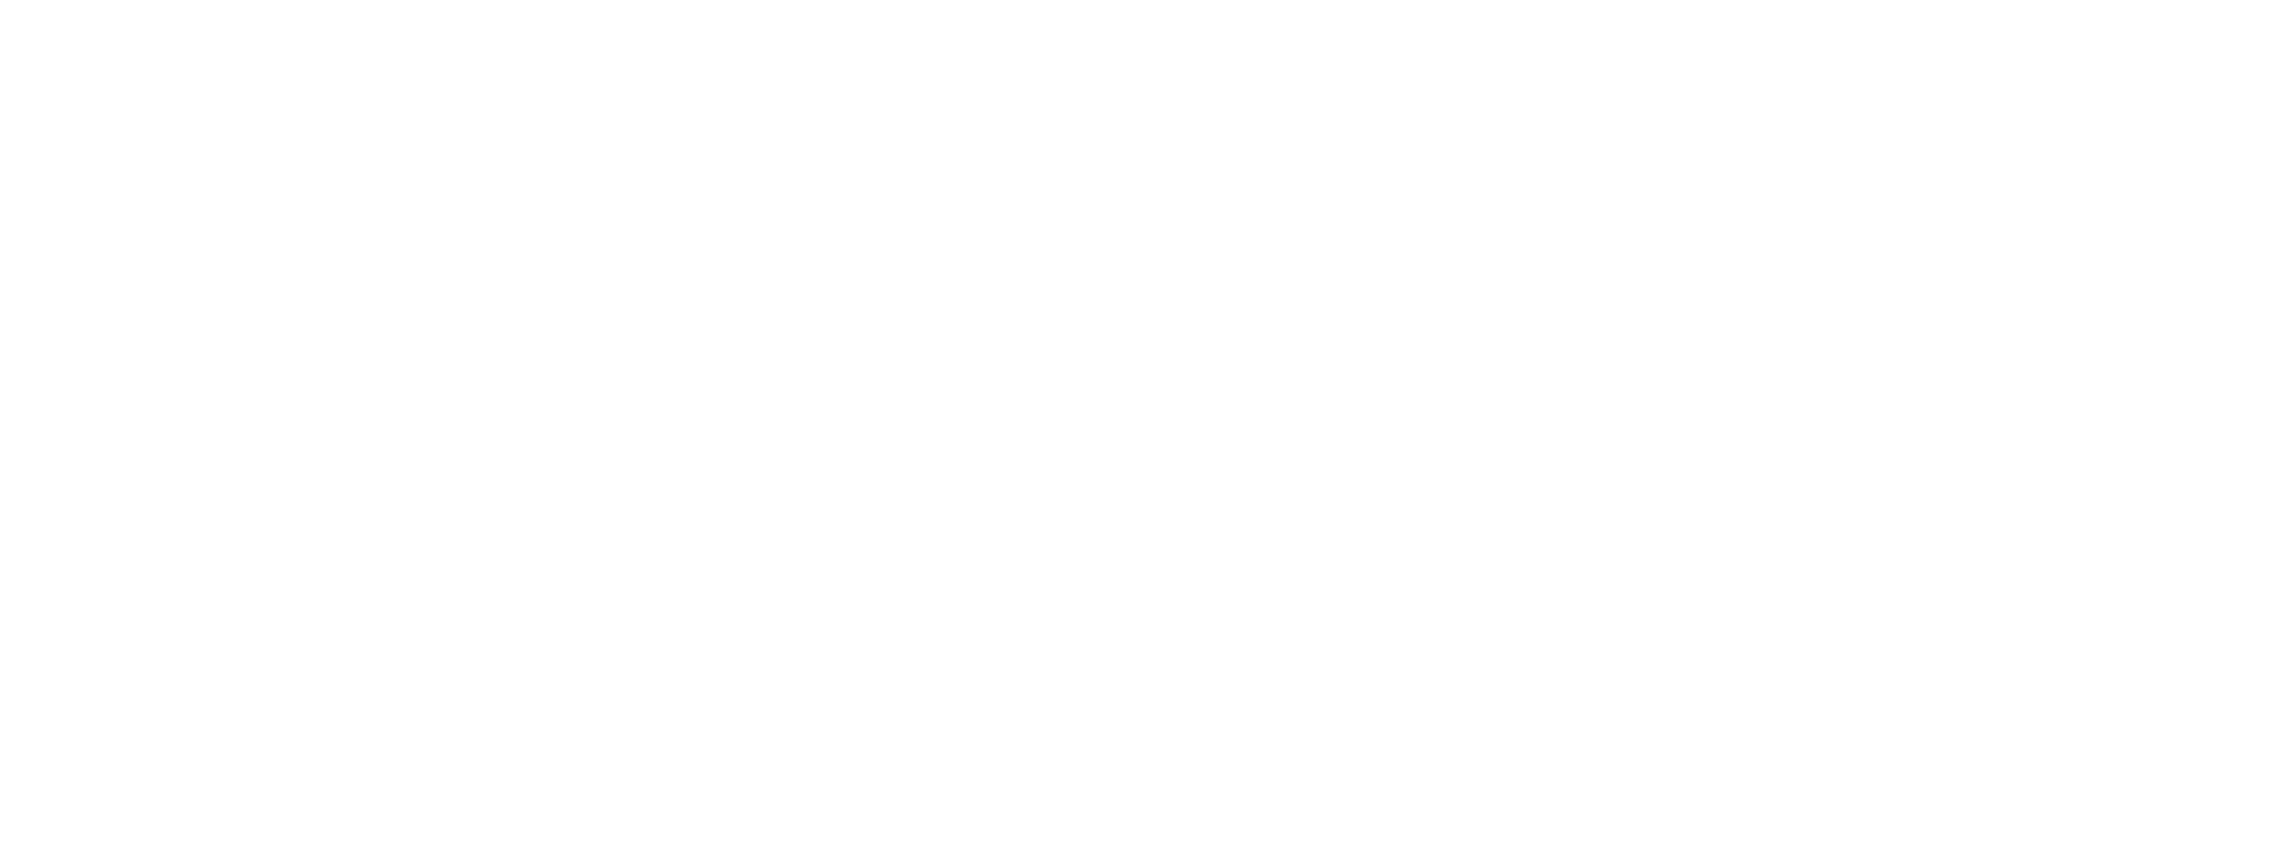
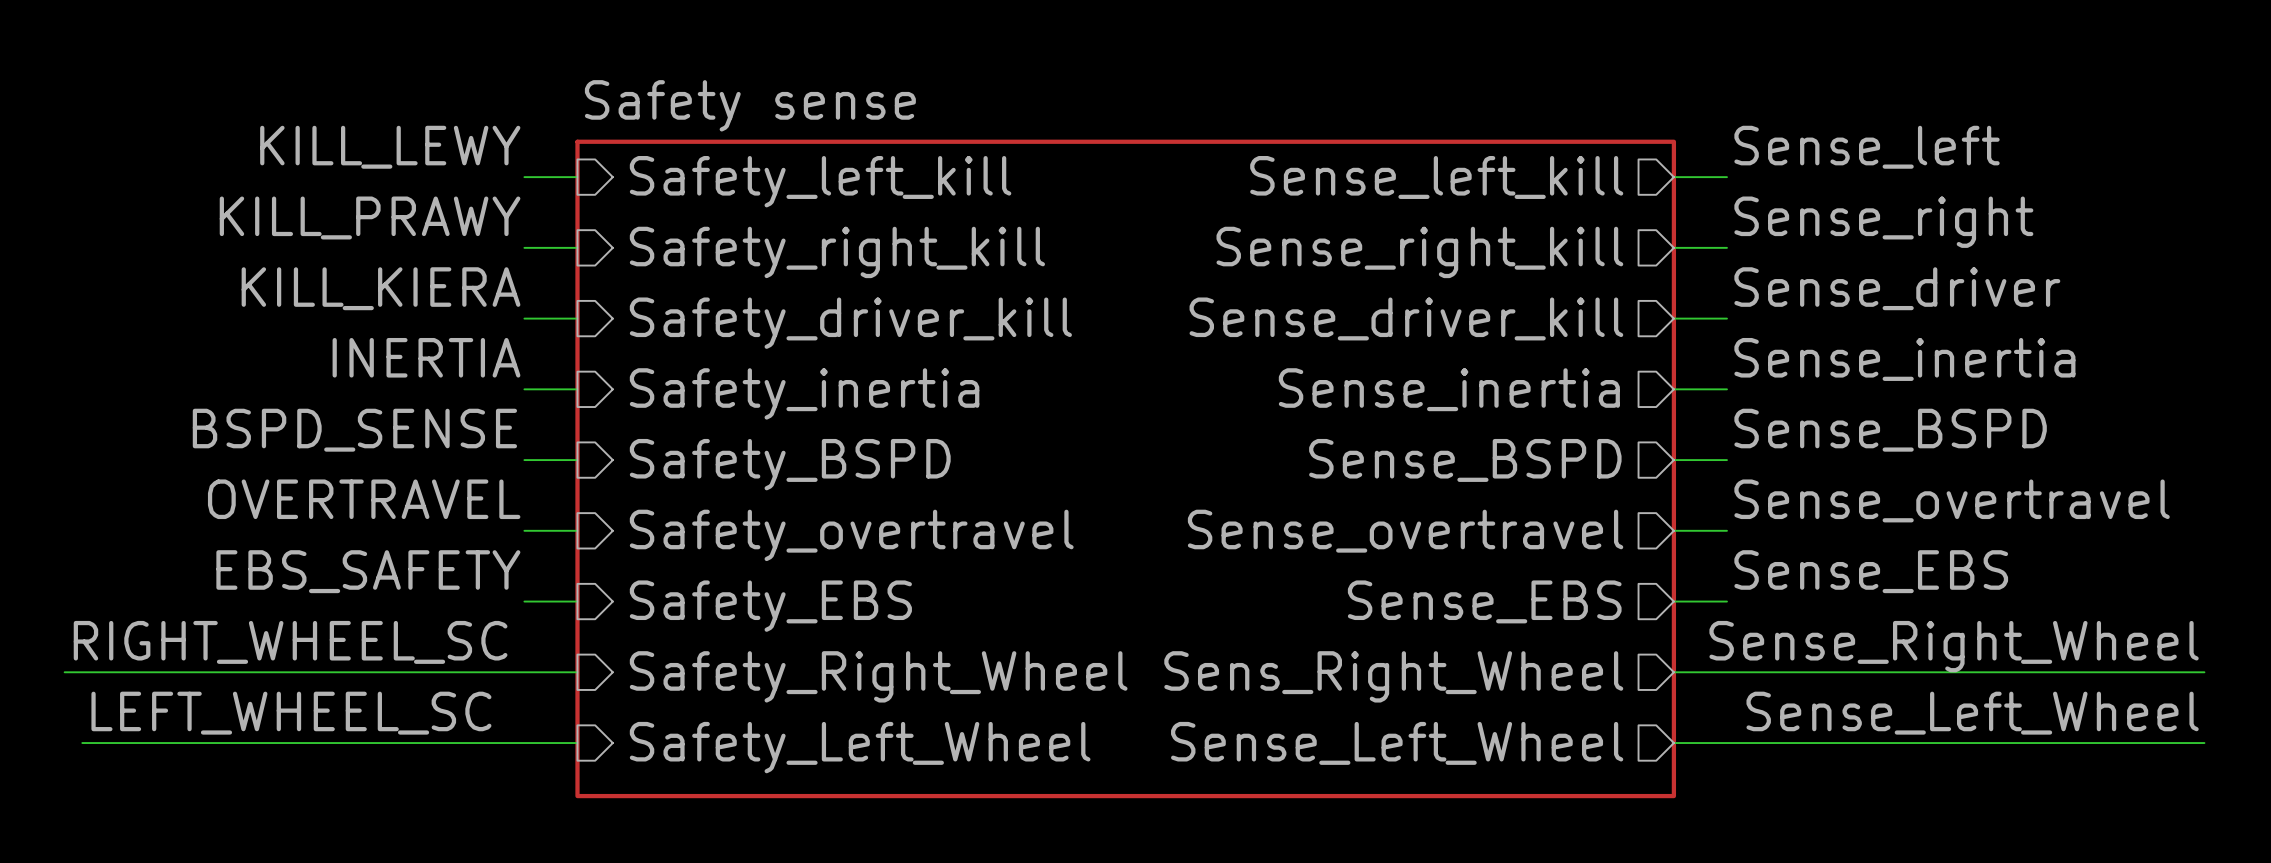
label: none -> KILL_LEWY (390, 147)
label: none -> Sense_left (1867, 147)
wire: none -> (524, 177) (577, 177)
sheet pin: none -> Sense_left_kill (1436, 177)
wire: none -> (1673, 177) (1726, 177)
sheet pin: none -> Safety_left_kill (820, 181)
label: none -> KILL_PRAWY (370, 217)
label: none -> Sense_right (1883, 222)
wire: none -> (524, 247) (577, 247)
wire: none -> (1673, 247) (1726, 247)
sheet pin: none -> Safety_right_kill (837, 252)
sheet pin: none -> Sense_right_kill (1419, 252)
label: none -> KILL_KIERA (381, 288)
label: none -> Sense_driver (1897, 288)
wire: none -> (524, 318) (577, 318)
sheet pin: none -> Sense_driver_kill (1406, 318)
wire: none -> (1673, 318) (1726, 318)
sheet pin: none -> Safety_driver_kill (850, 323)
label: none -> INERTIA (426, 357)
label: none -> Sense_inertia (1904, 359)
wire: none -> (524, 389) (577, 389)
sheet pin: none -> Sense_inertia (1449, 389)
wire: none -> (1673, 389) (1726, 389)
sheet pin: none -> Safety_inertia (804, 393)
label: none -> BSPD_SENSE (354, 430)
label: none -> Sense_BSPD (1890, 430)
wire: none -> (524, 460) (577, 460)
sheet pin: none -> Sense_BSPD (1465, 460)
wire: none -> (1673, 460) (1726, 460)
sheet pin: none -> Safety_BSPD (790, 464)
sheet Safety sense: none -> (1125, 468)
label: none -> OVERTRAVEL (364, 499)
label: none -> Sense_overtravel (1952, 500)
wire: none -> (524, 530) (577, 530)
wire: none -> (1673, 530) (1726, 530)
sheet pin: none -> Sense_overtravel (1405, 531)
sheet pin: none -> Safety_overtravel (851, 535)
label: none -> EBS_SAFETY (368, 571)
label: none -> Sense_EBS (1871, 571)
wire: none -> (524, 601) (577, 601)
sheet pin: none -> Sense_EBS (1484, 601)
wire: none -> (1673, 601) (1726, 601)
sheet pin: none -> Safety_EBS (770, 606)
label: none -> RIGHT_WHEEL_SC (290, 642)
label: none -> Sense_Right_Wheel (1954, 646)
wire: none -> (64, 672) (577, 672)
wire: none -> (1673, 672) (2204, 672)
sheet pin: none -> Safety_Right_Wheel (878, 676)
sheet pin: none -> Sens_Right_Wheel (1393, 676)
label: none -> LEFT_WHEEL_SC (291, 713)
label: none -> Sense_Left_Wheel (1972, 713)
wire: none -> (82, 743) (577, 743)
sheet pin: none -> Sense_Left_Wheel (1397, 743)
wire: none -> (1673, 743) (2204, 743)
sheet pin: none -> Safety_Left_Wheel (860, 747)

